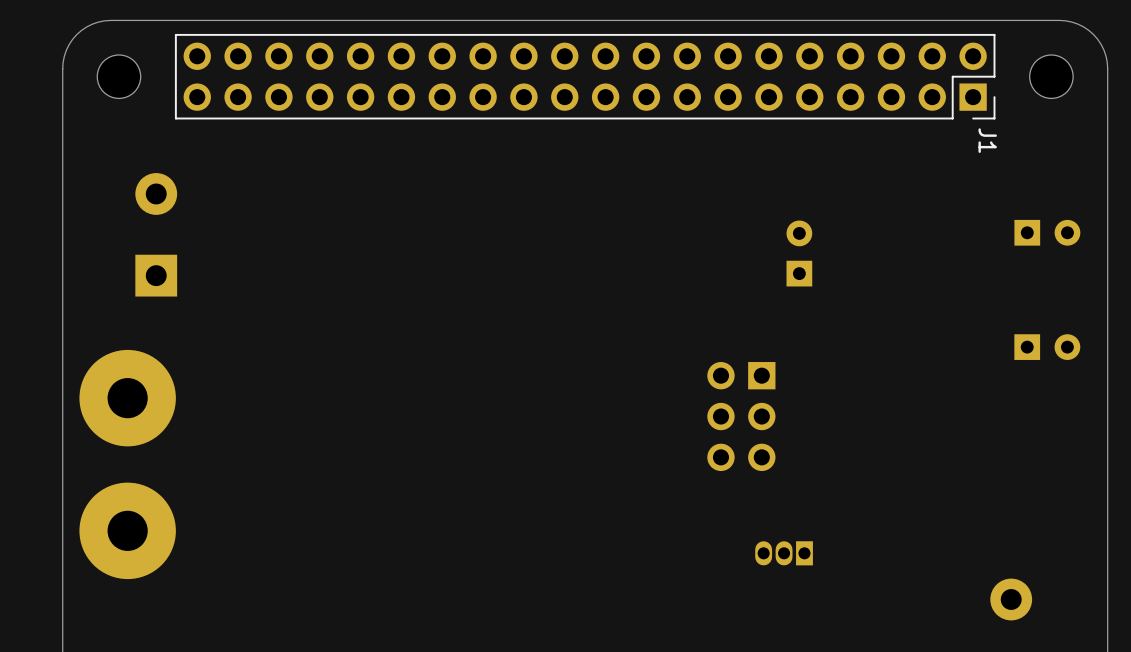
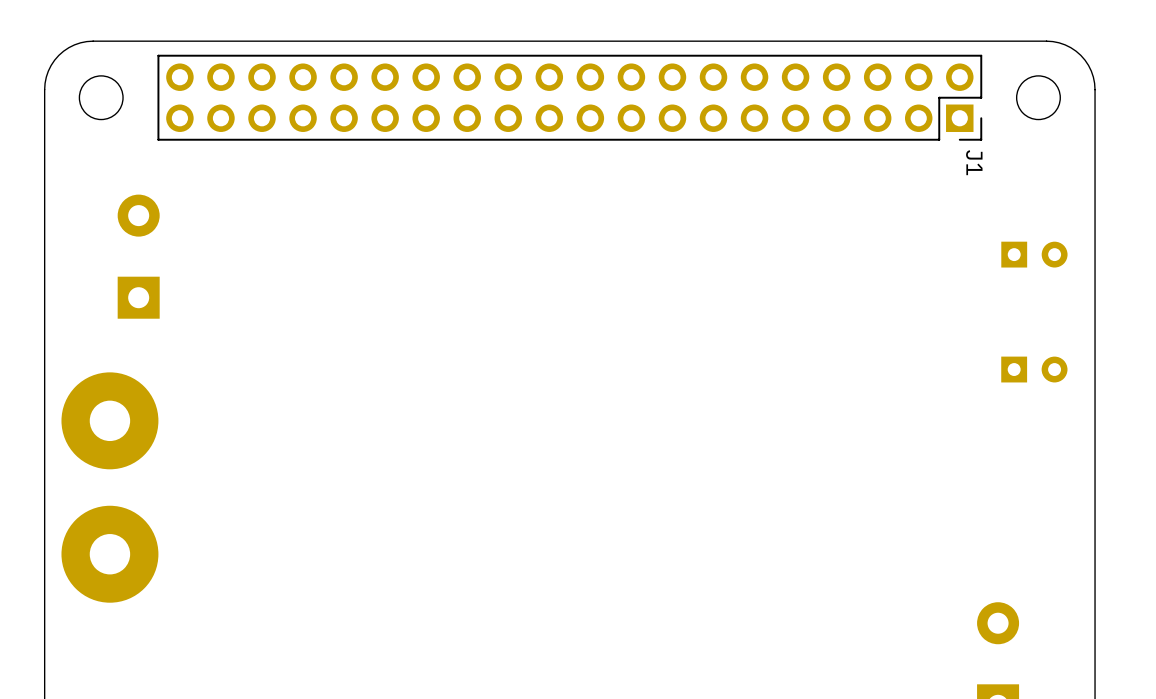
part: (799, 253) -> none
part: (741, 416) -> none
part: (784, 553) -> none

